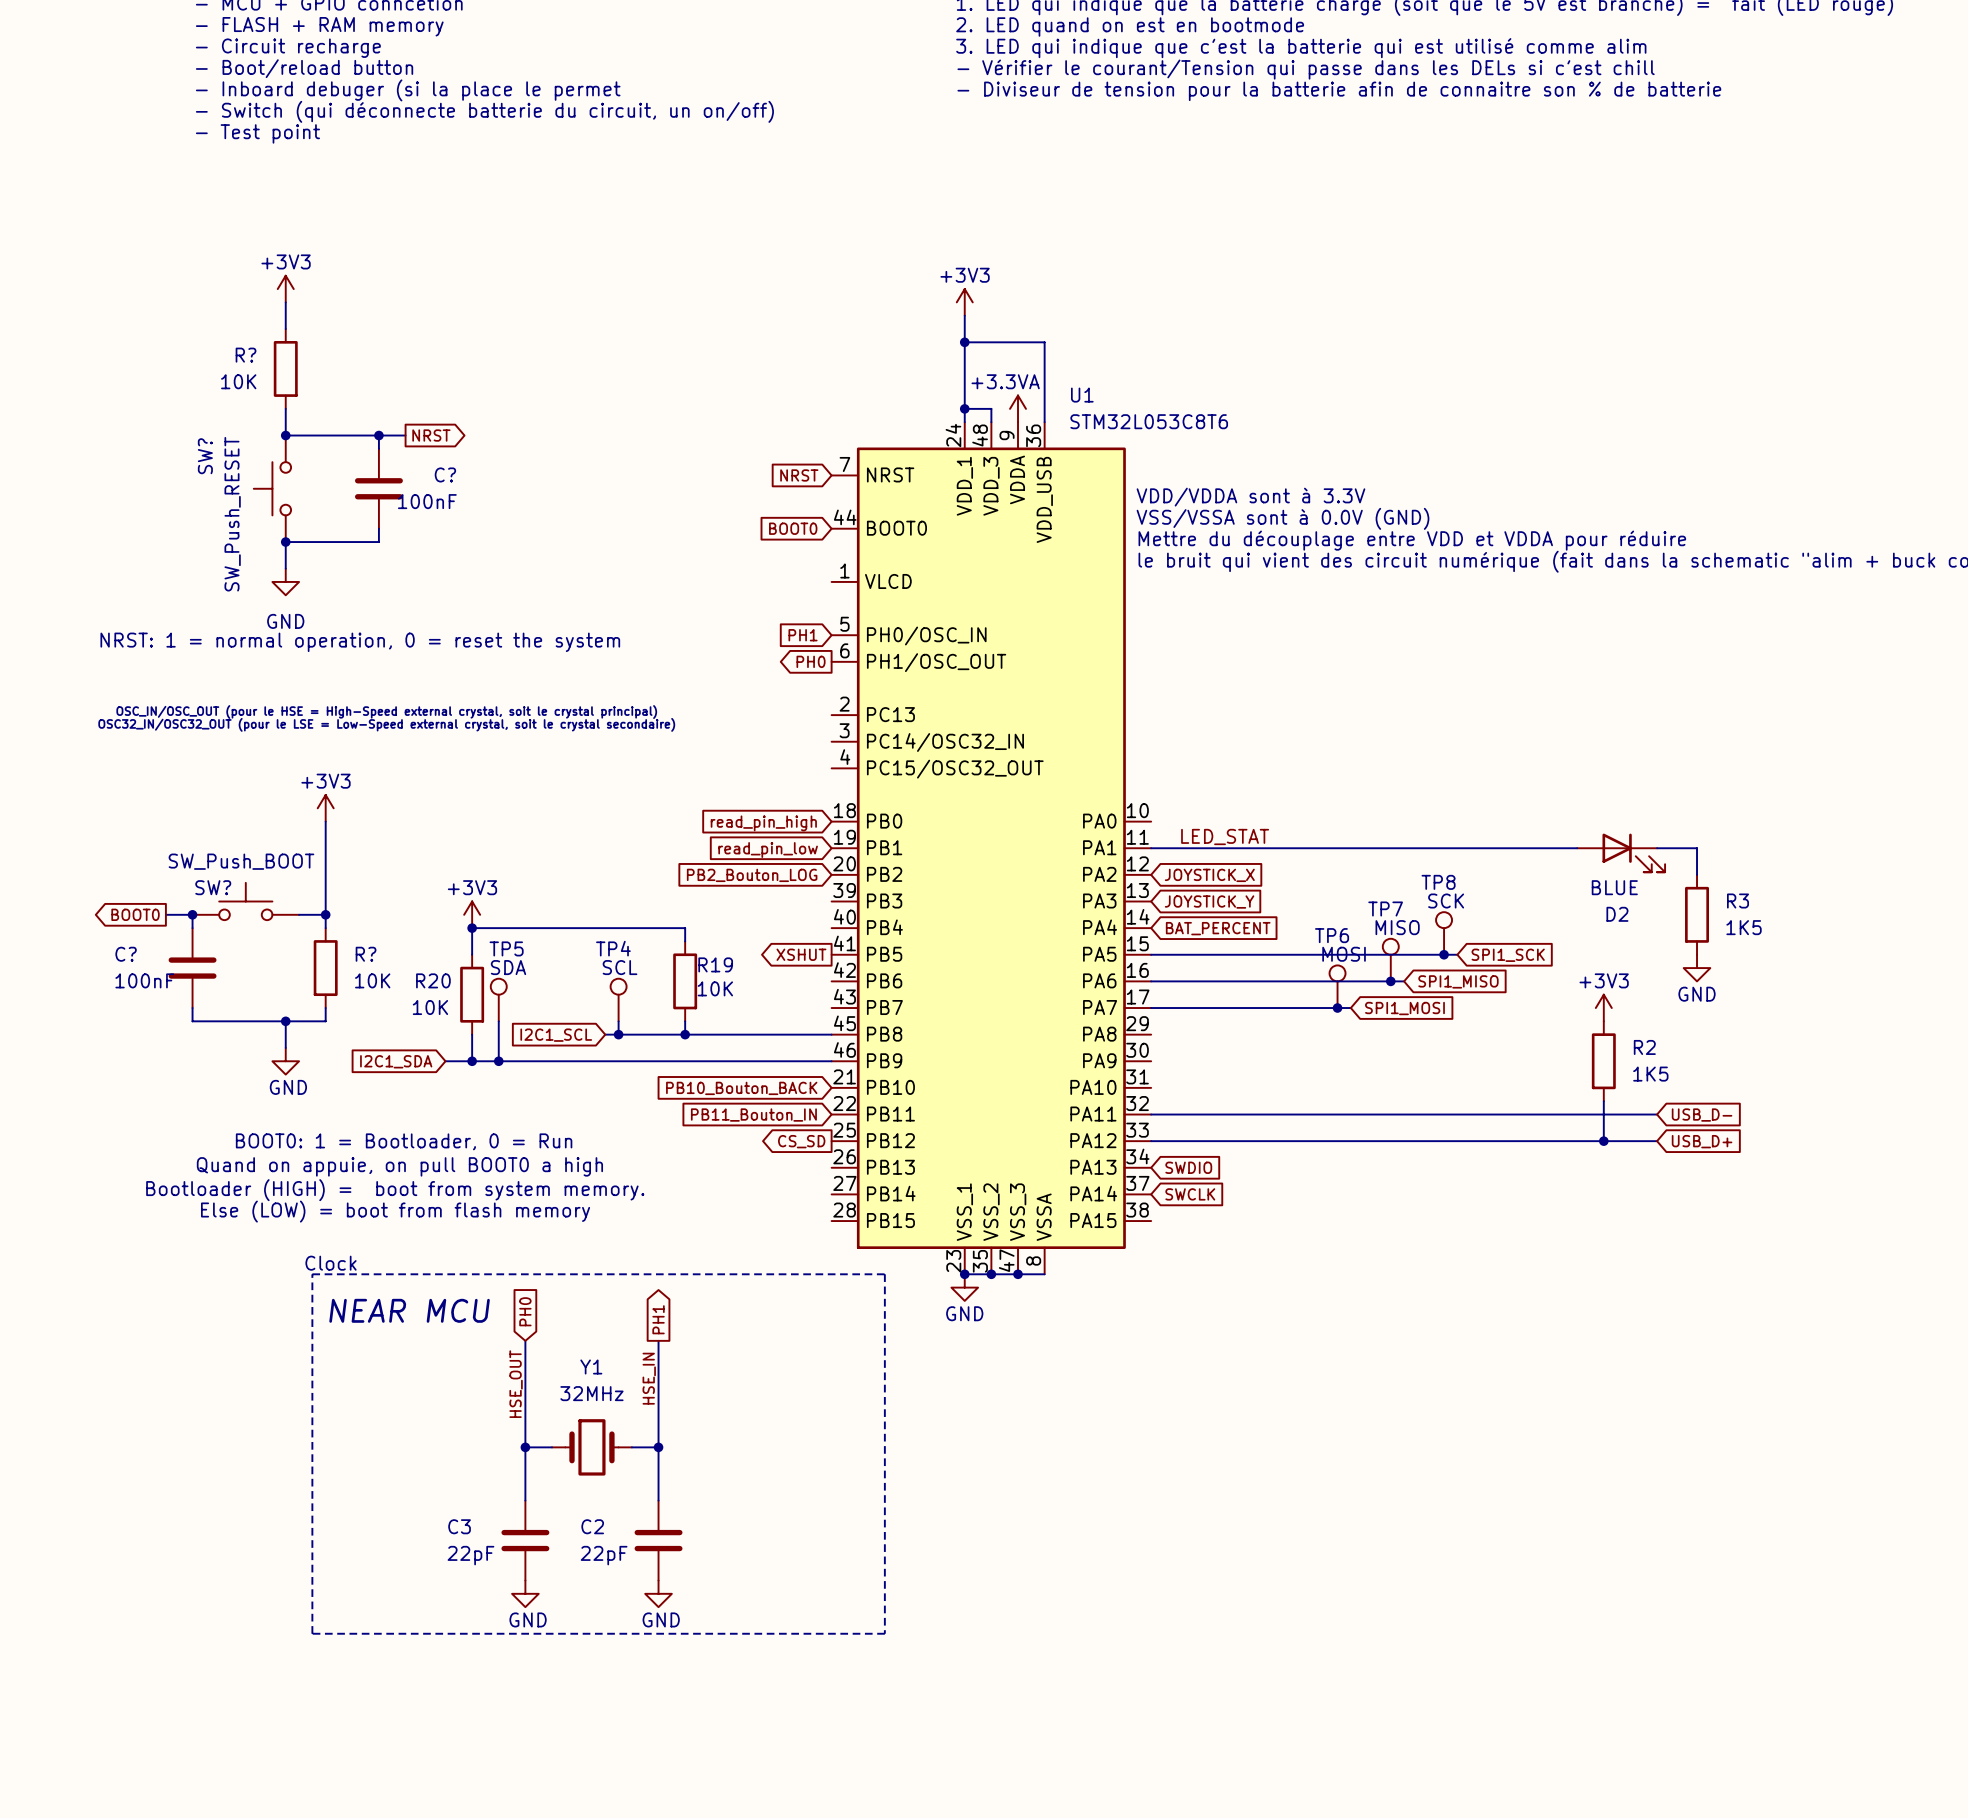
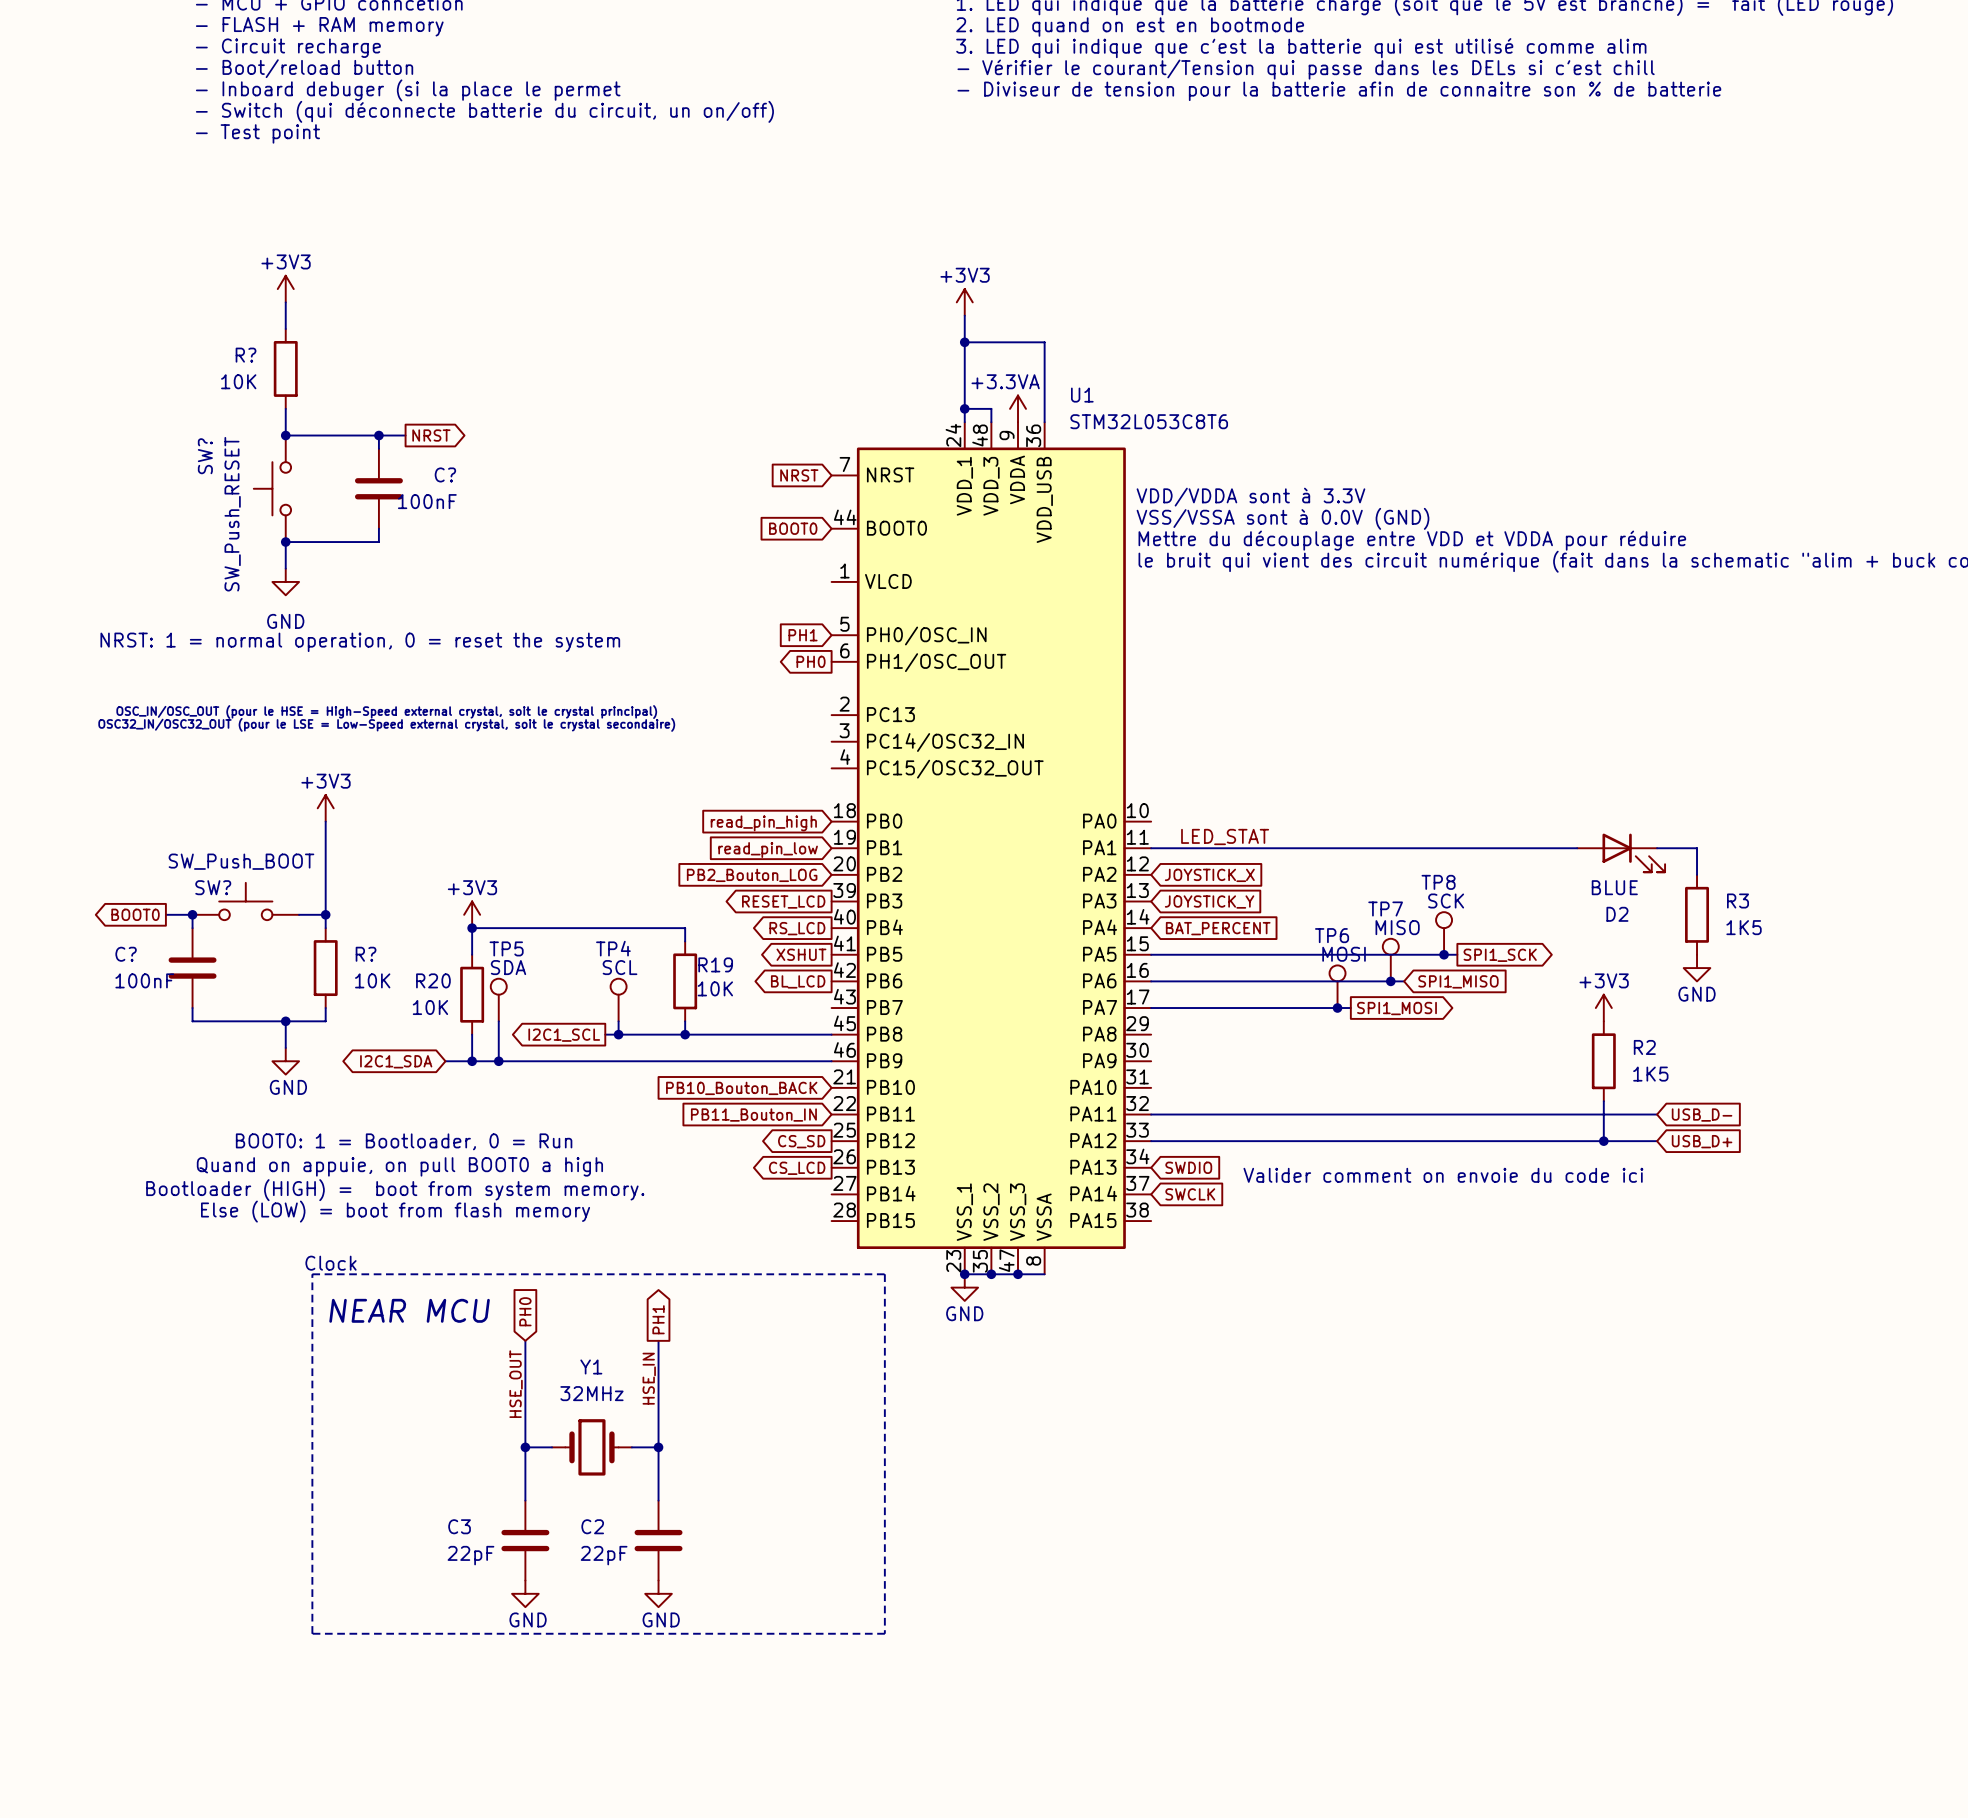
global label: none -> RESET_LCD (783, 902)
global label: none -> RS_LCD (797, 928)
global label shape: input (1508, 955) -> output (1500, 955)
global label: none -> BL_LCD (798, 981)
global label shape: input (1404, 1008) -> output (1396, 1008)
global label shape: input (556, 1035) -> output (564, 1035)
global label shape: input (396, 1061) -> bidirectional (396, 1061)
global label: none -> CS_LCD (797, 1168)
text: none -> Valider comment on envoie du code ici (1443, 1175)

